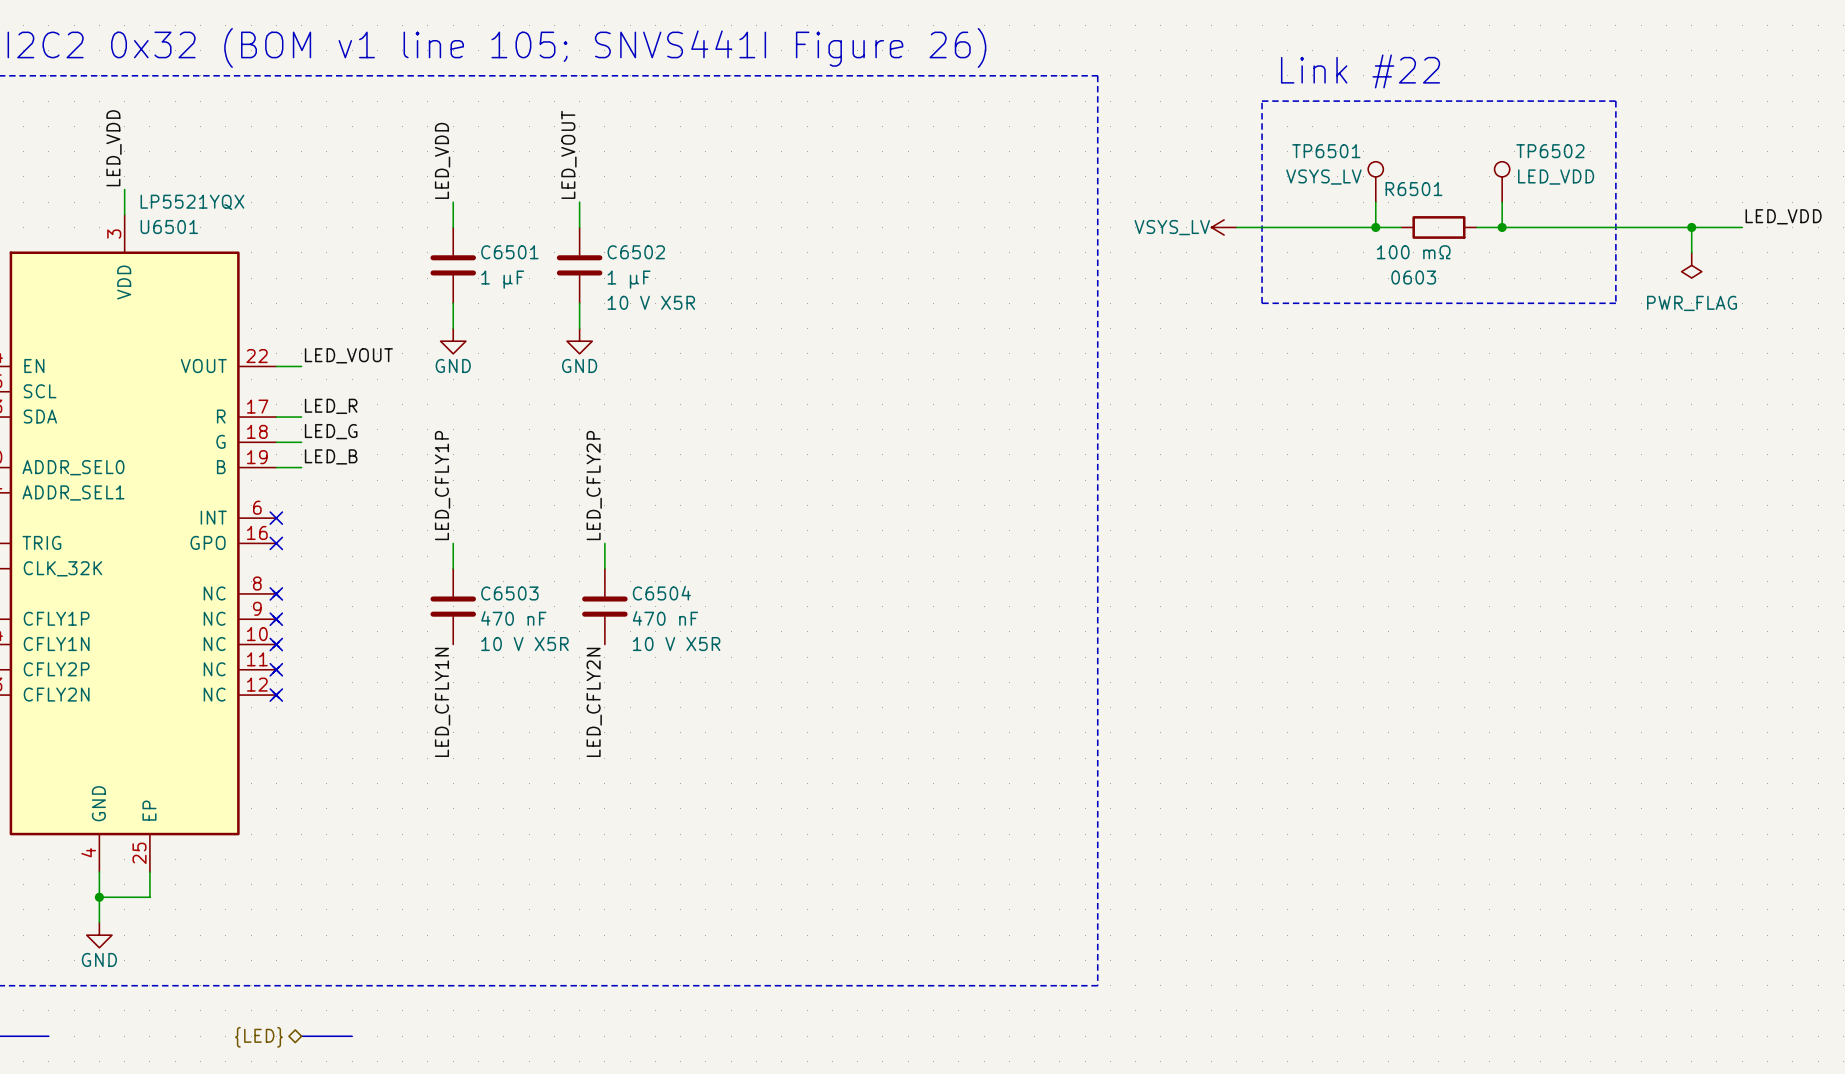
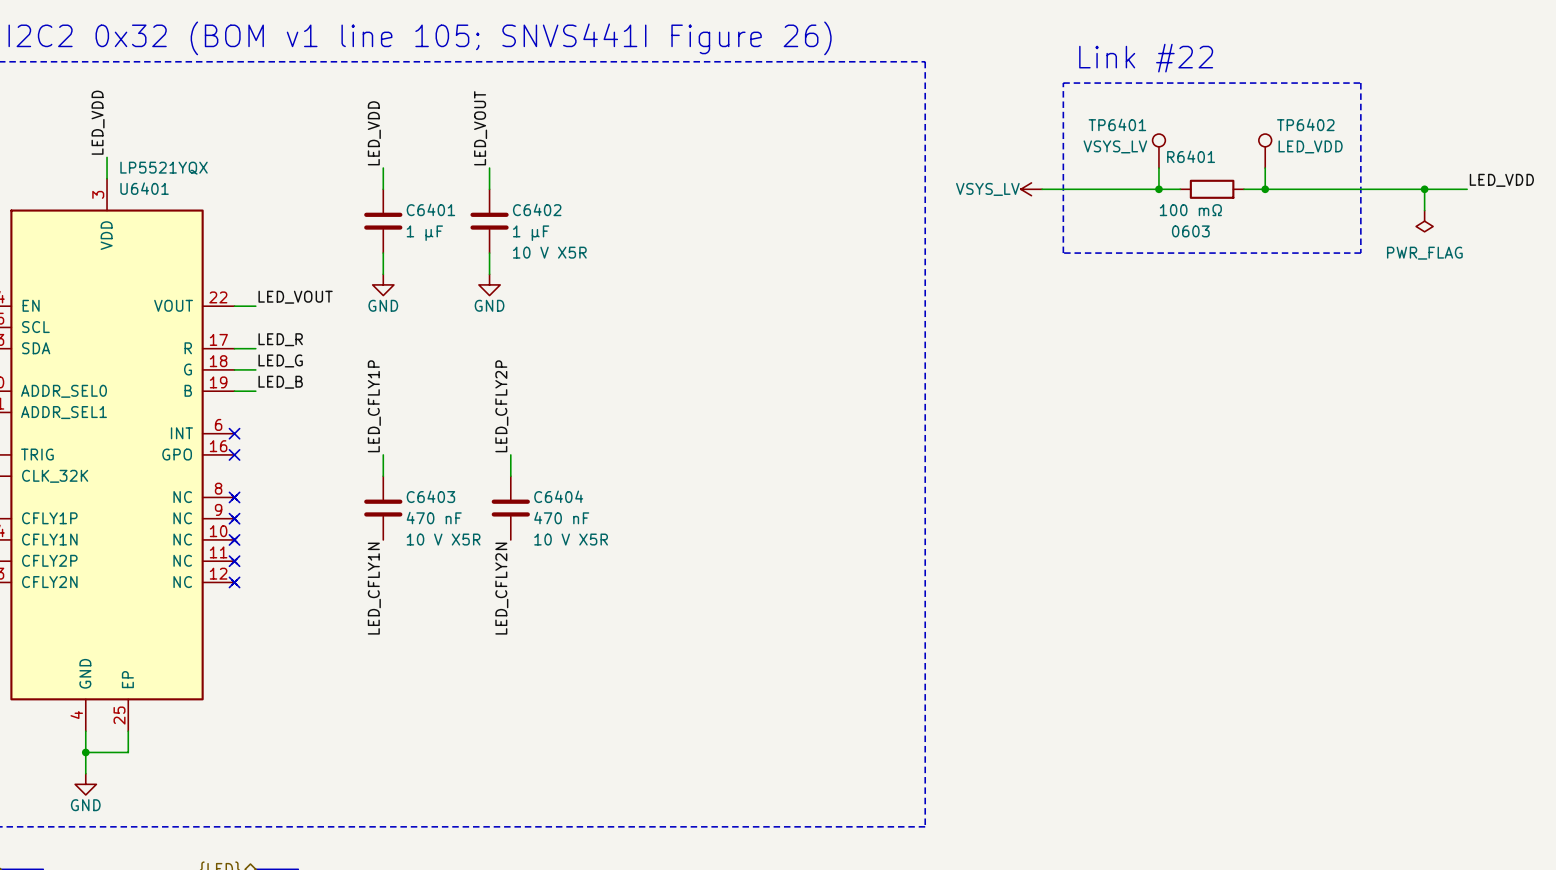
TP6501 name: TP6501 (1326, 151) -> TP6401 (1117, 124)
TP6502 name: TP6502 (1550, 151) -> TP6402 (1305, 124)
R6501 name: R6501 (1413, 189) -> R6401 (1191, 156)
U6501 name: U6501 (169, 226) -> U6401 (144, 188)
C6501 name: C6501 (509, 252) -> C6401 (430, 209)
C6502 name: C6502 (636, 252) -> C6402 (537, 209)
C6503 name: C6503 (509, 593) -> C6403 (430, 496)
C6504 name: C6504 (661, 593) -> C6404 (558, 496)

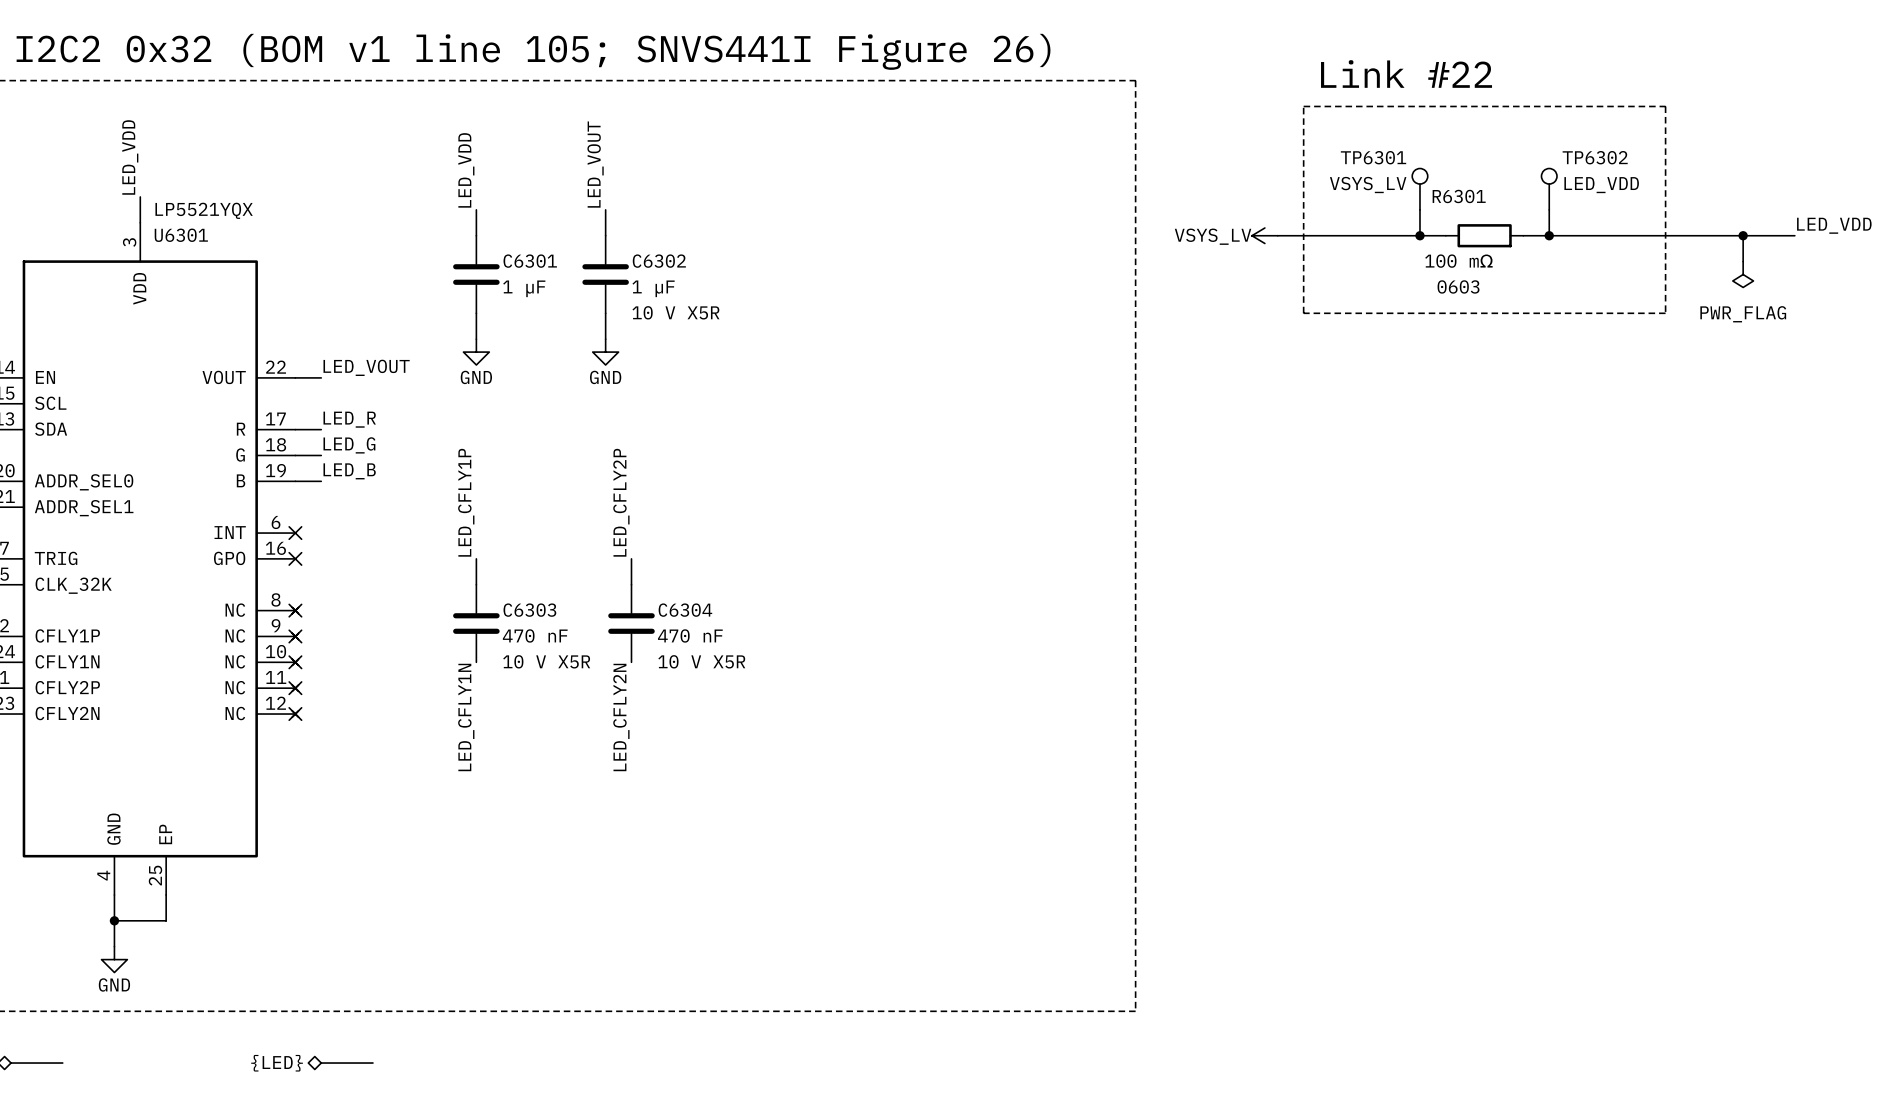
TP6401 name: TP6401 (1117, 124) -> TP6301 (1373, 157)
TP6402 name: TP6402 (1305, 124) -> TP6302 (1595, 157)
R6401 name: R6401 (1191, 156) -> R6301 (1459, 196)
U6401 name: U6401 (144, 188) -> U6301 (181, 235)
C6401 name: C6401 (430, 209) -> C6301 (530, 261)
C6402 name: C6402 (537, 209) -> C6302 (659, 261)
C6403 name: C6403 (430, 496) -> C6303 (529, 610)
C6404 name: C6404 (558, 496) -> C6304 (685, 610)

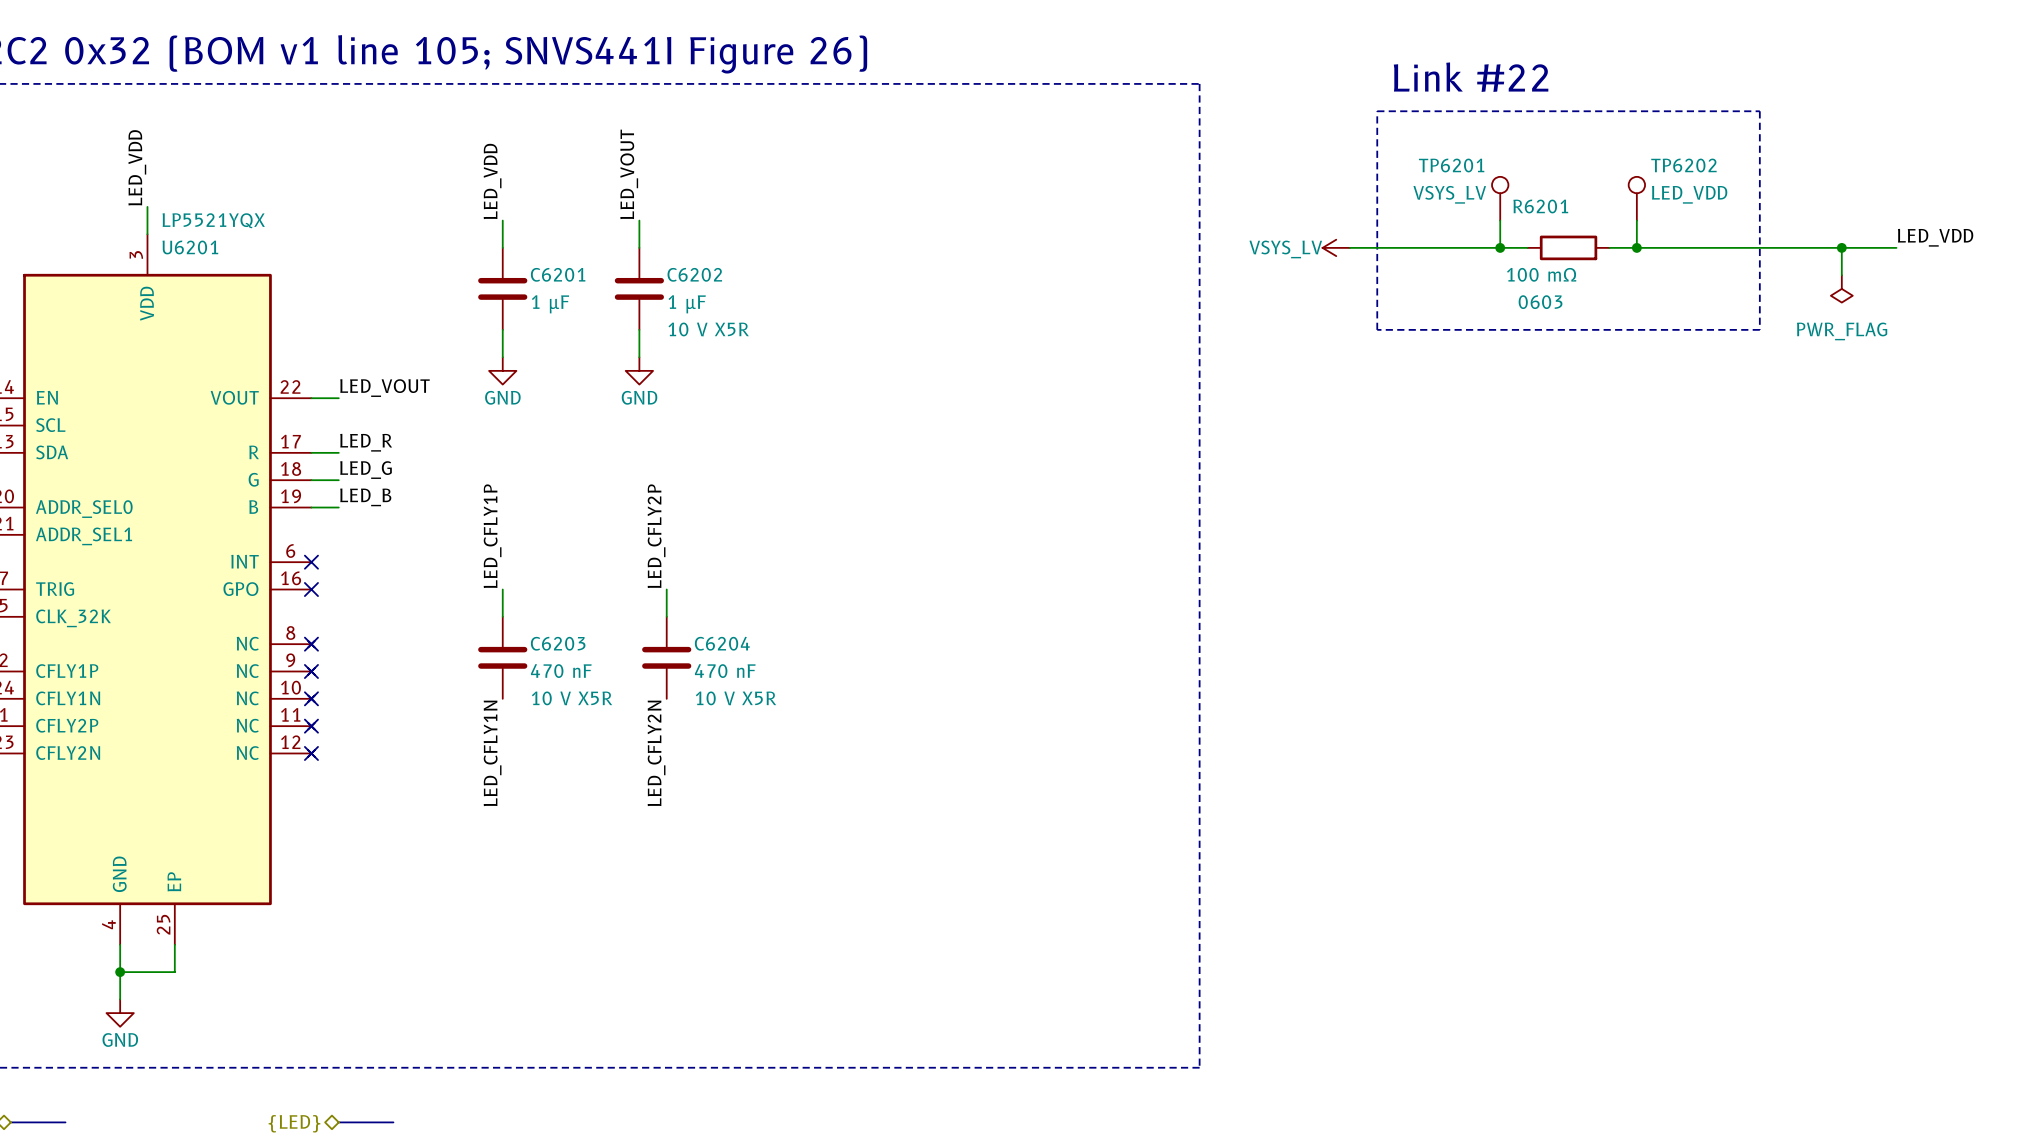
TP6301 name: TP6301 (1373, 157) -> TP6201 (1451, 165)
TP6302 name: TP6302 (1595, 157) -> TP6202 (1683, 165)
R6301 name: R6301 (1459, 196) -> R6201 (1540, 206)
U6301 name: U6301 (181, 235) -> U6201 (190, 247)
C6301 name: C6301 (530, 261) -> C6201 (558, 274)
C6302 name: C6302 (659, 261) -> C6202 (694, 274)
C6303 name: C6303 (529, 610) -> C6203 (558, 643)
C6304 name: C6304 (685, 610) -> C6204 (722, 643)

